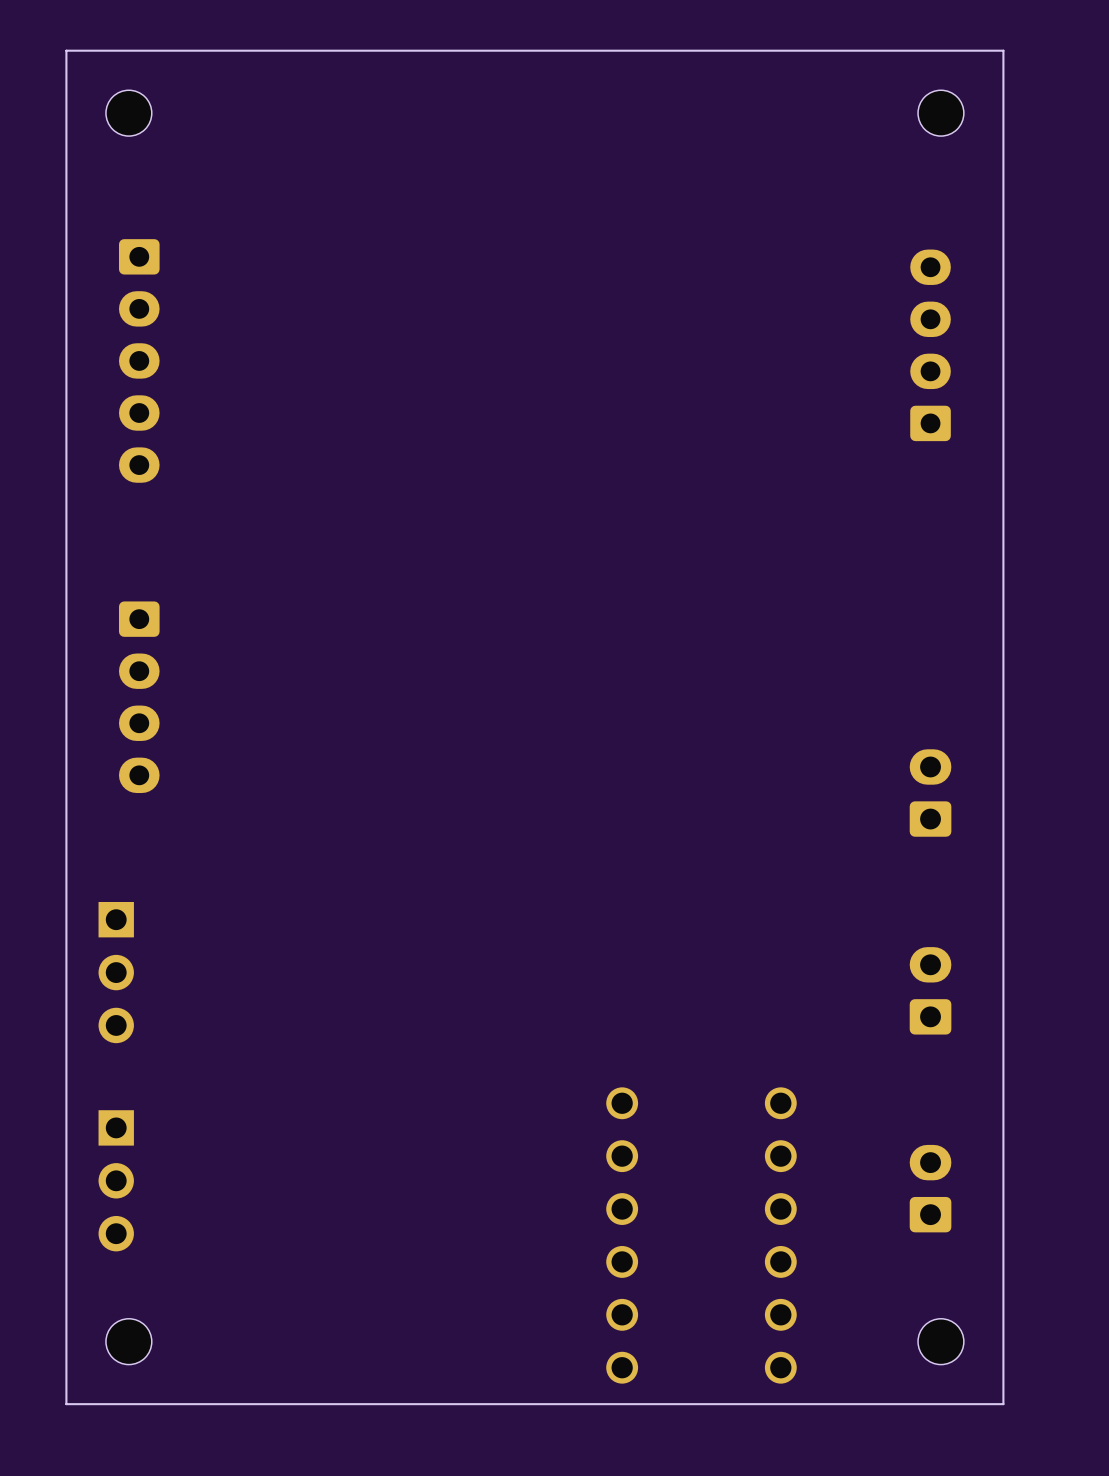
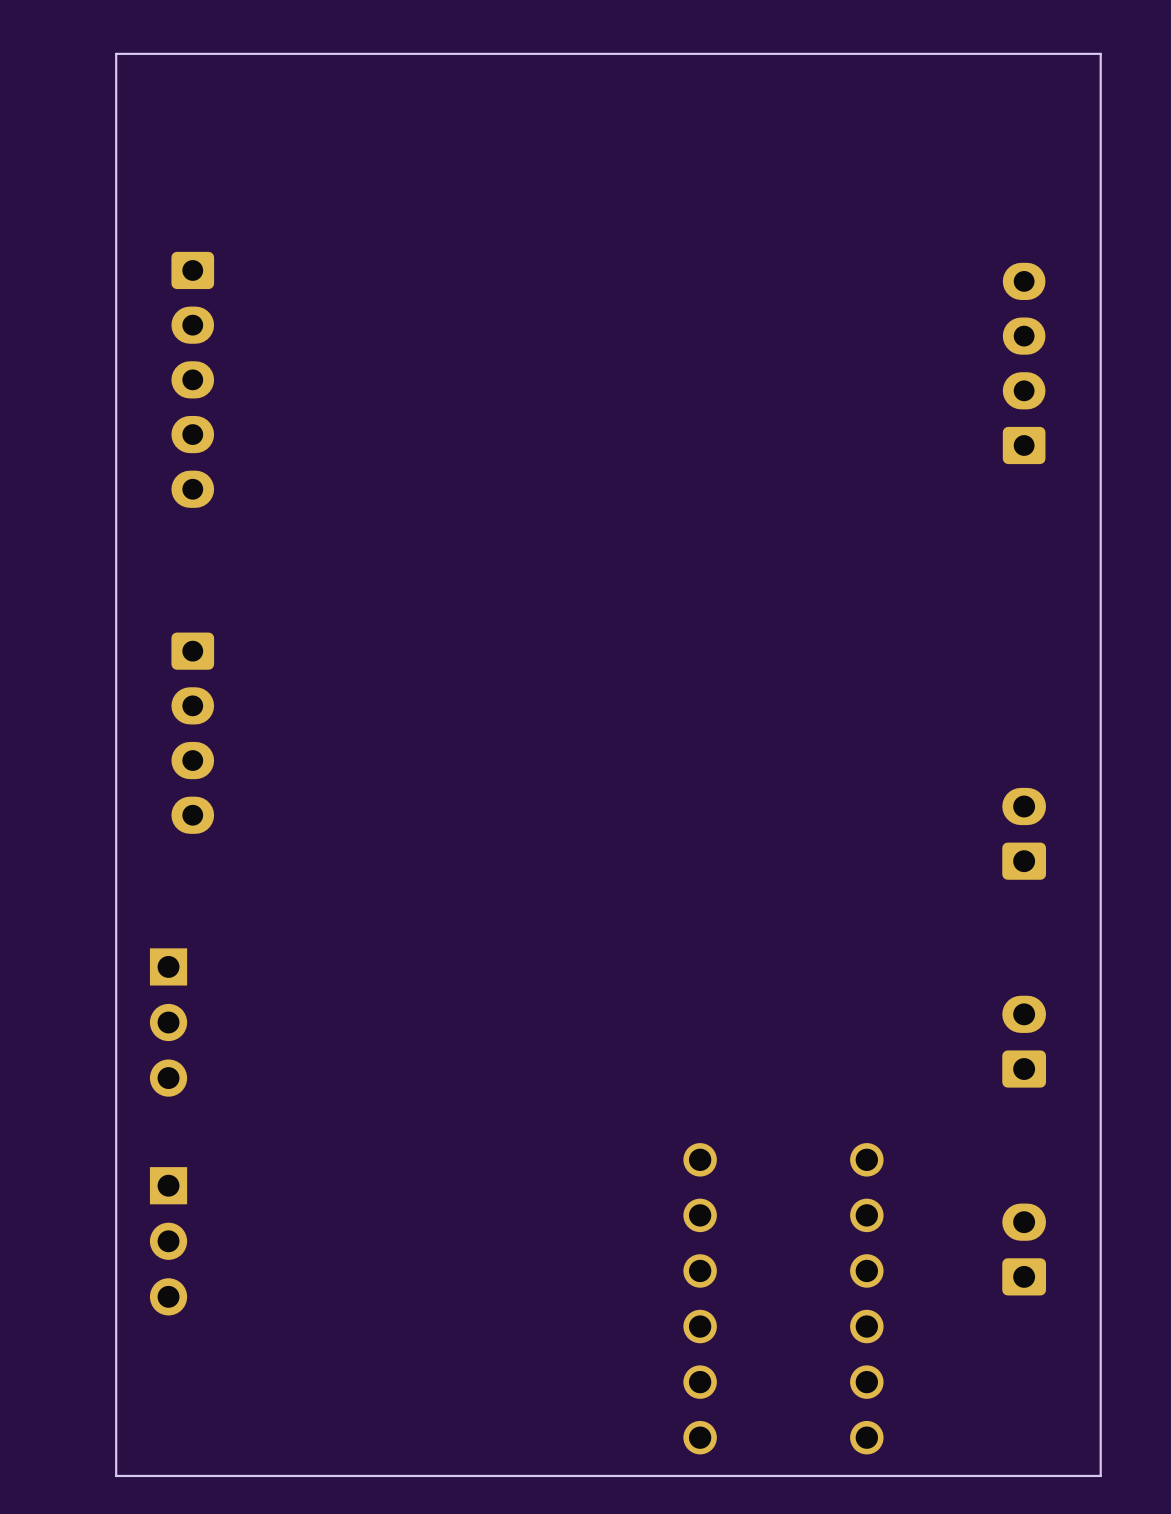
part: (128, 113) -> none
part: (940, 113) -> none
part: (128, 1341) -> none
part: (940, 1341) -> none

